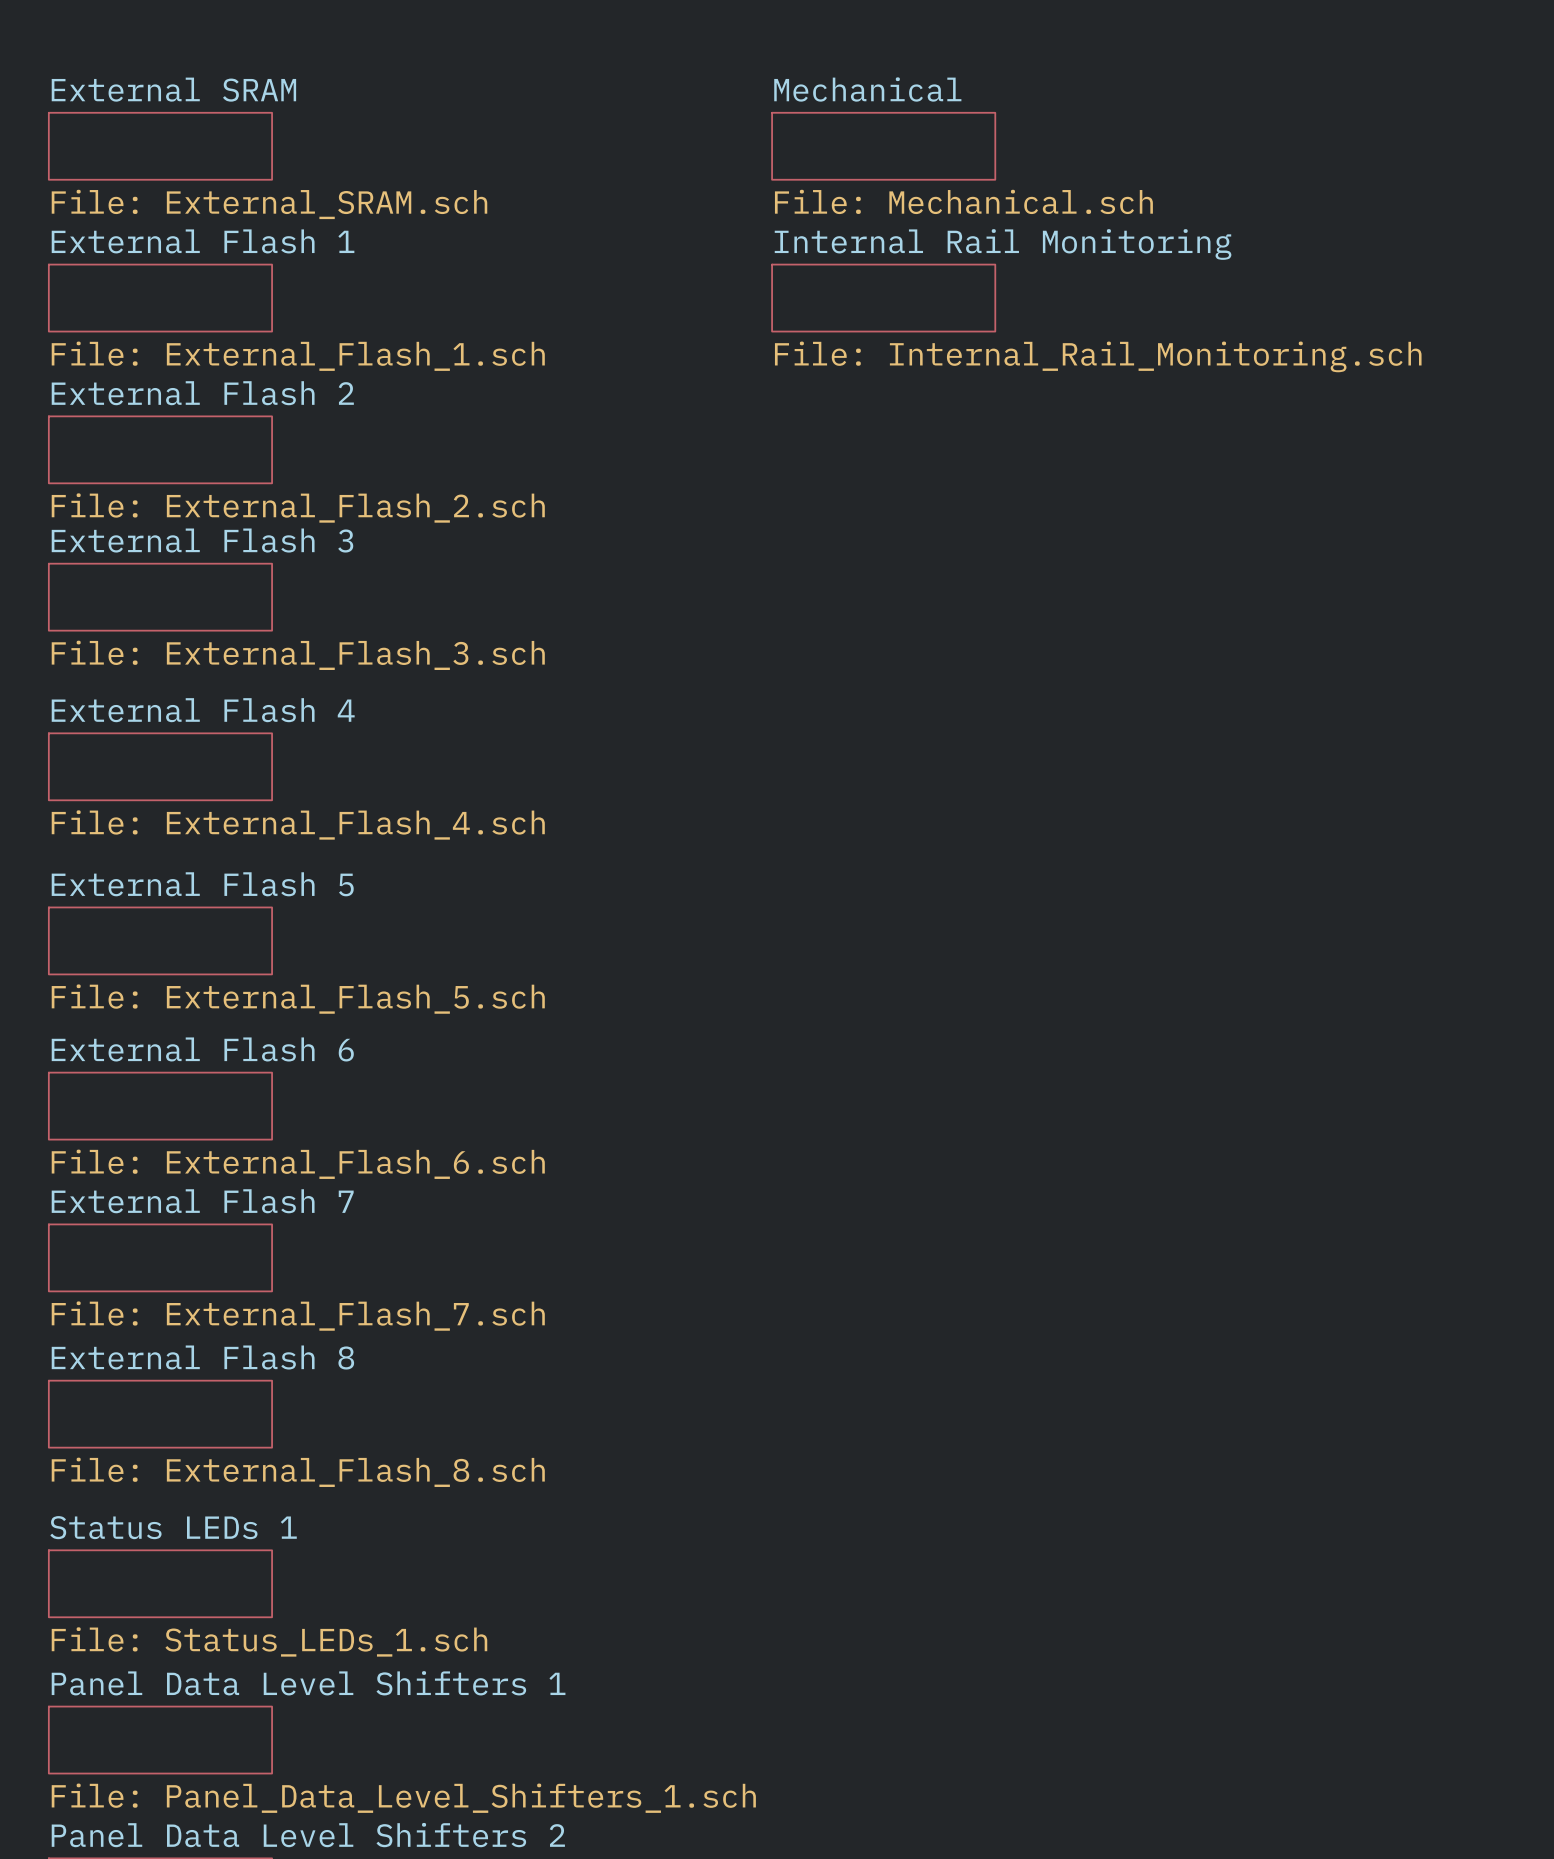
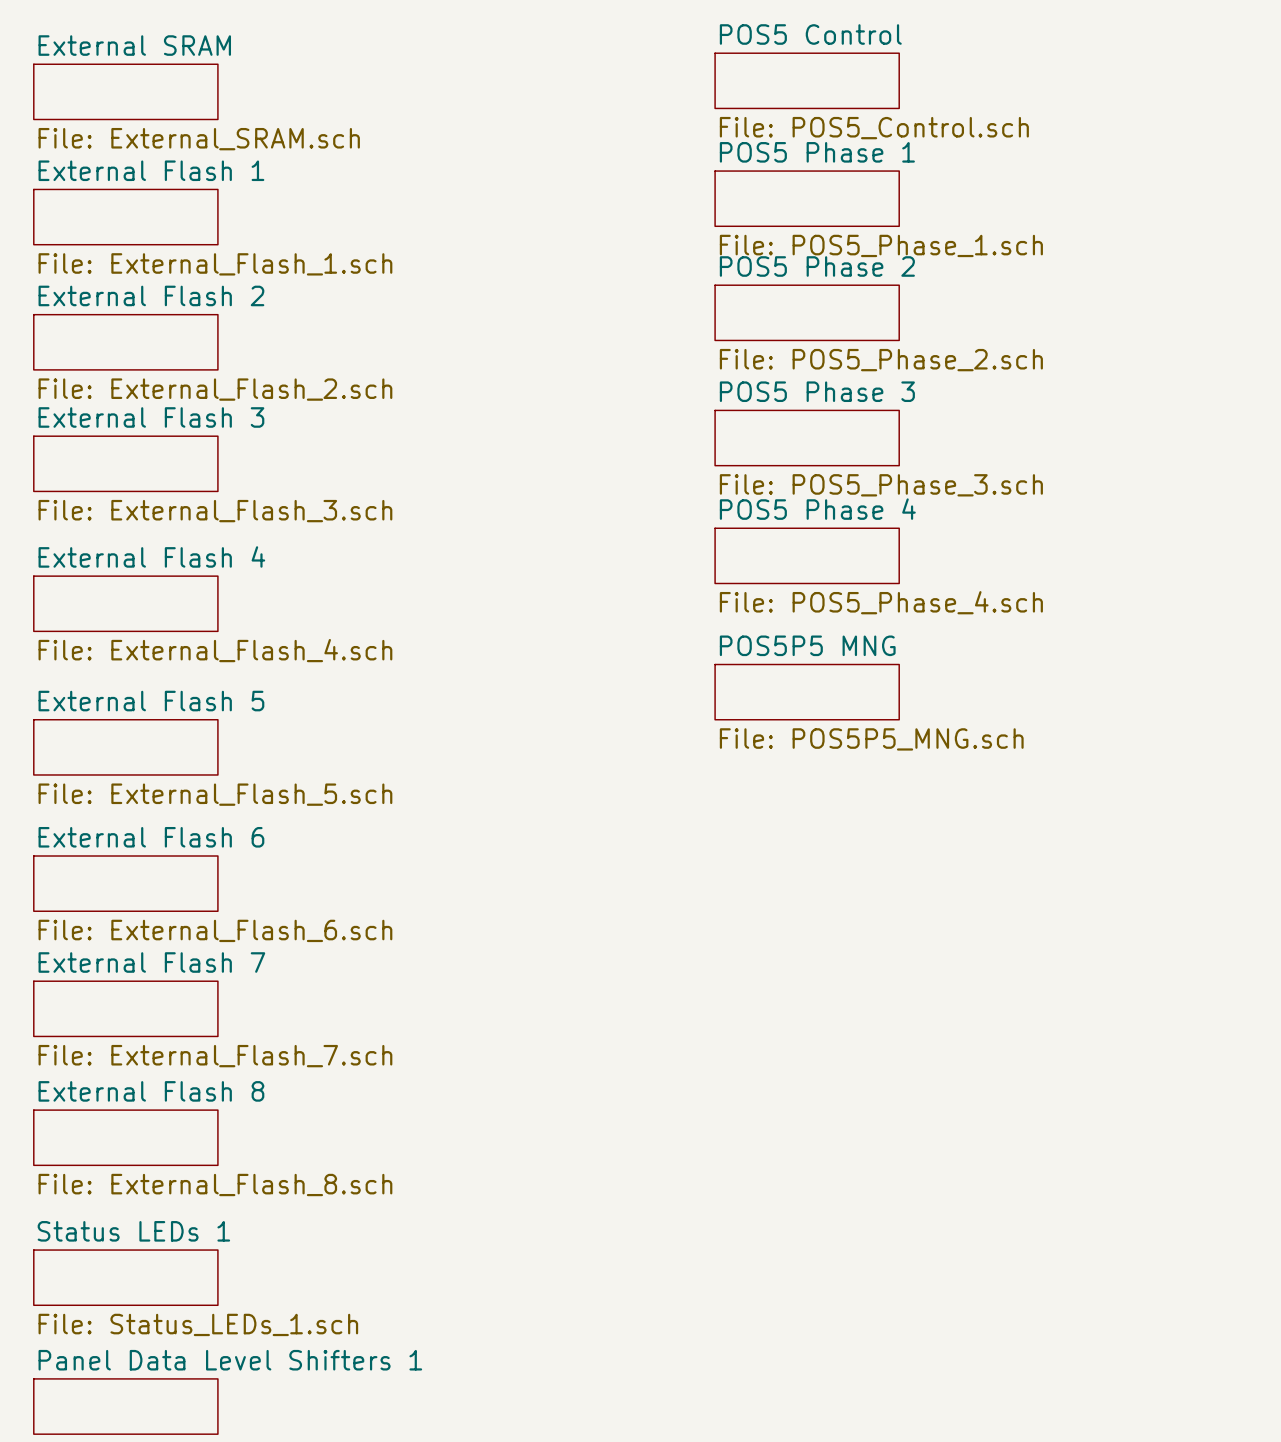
sheet POS5 Control: none -> File: POS5_Control.sch (807, 80)
sheet Mechanical: File: Mechanical.sch (883, 146) -> none
sheet POS5 Phase 1: none -> File: POS5_Phase_1.sch (807, 198)
sheet Internal Rail Monitoring: File: Internal_Rail_Monitoring.sch (883, 298) -> none
sheet POS5 Phase 2: none -> File: POS5_Phase_2.sch (807, 312)
sheet POS5 Phase 3: none -> File: POS5_Phase_3.sch (807, 438)
sheet POS5 Phase 4: none -> File: POS5_Phase_4.sch (807, 555)
sheet POS5P5 MNG: none -> File: POS5P5_MNG.sch (807, 692)

